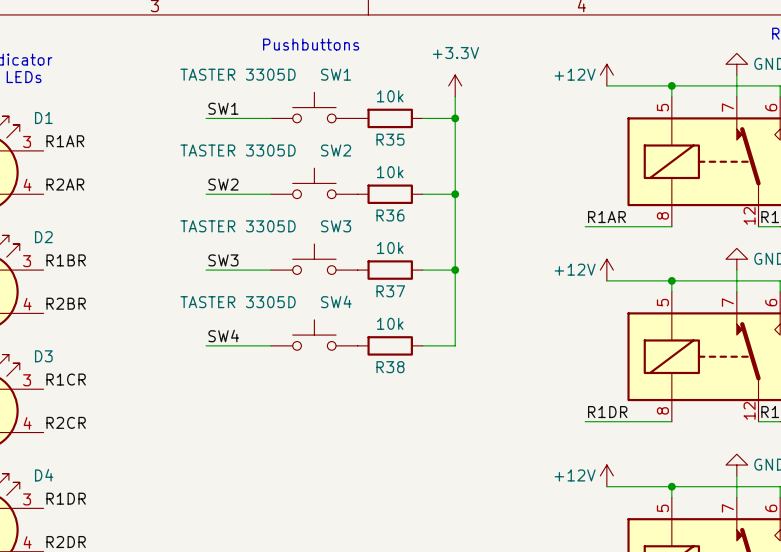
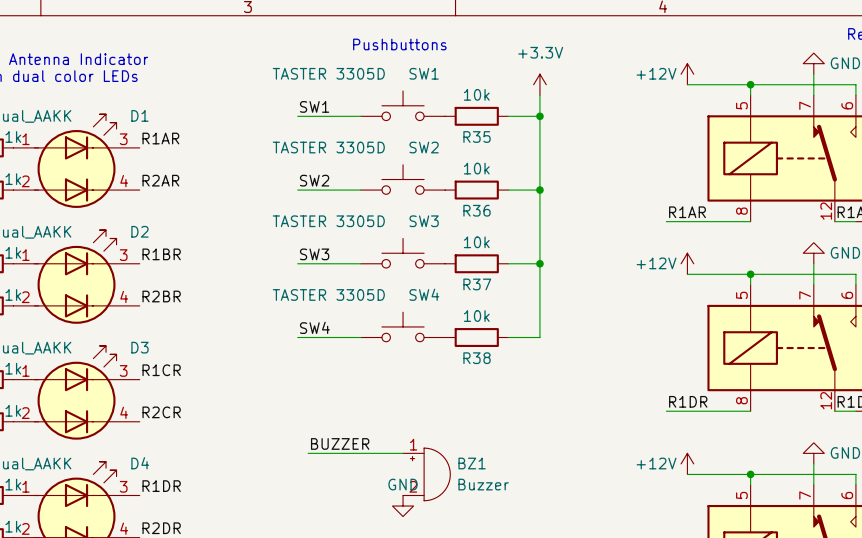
label: none -> BUZZER (340, 443)
wire: none -> (308, 453) (403, 453)
BZ1: none -> Buzzer (426, 474)
power symbol: none -> GND (403, 506)

